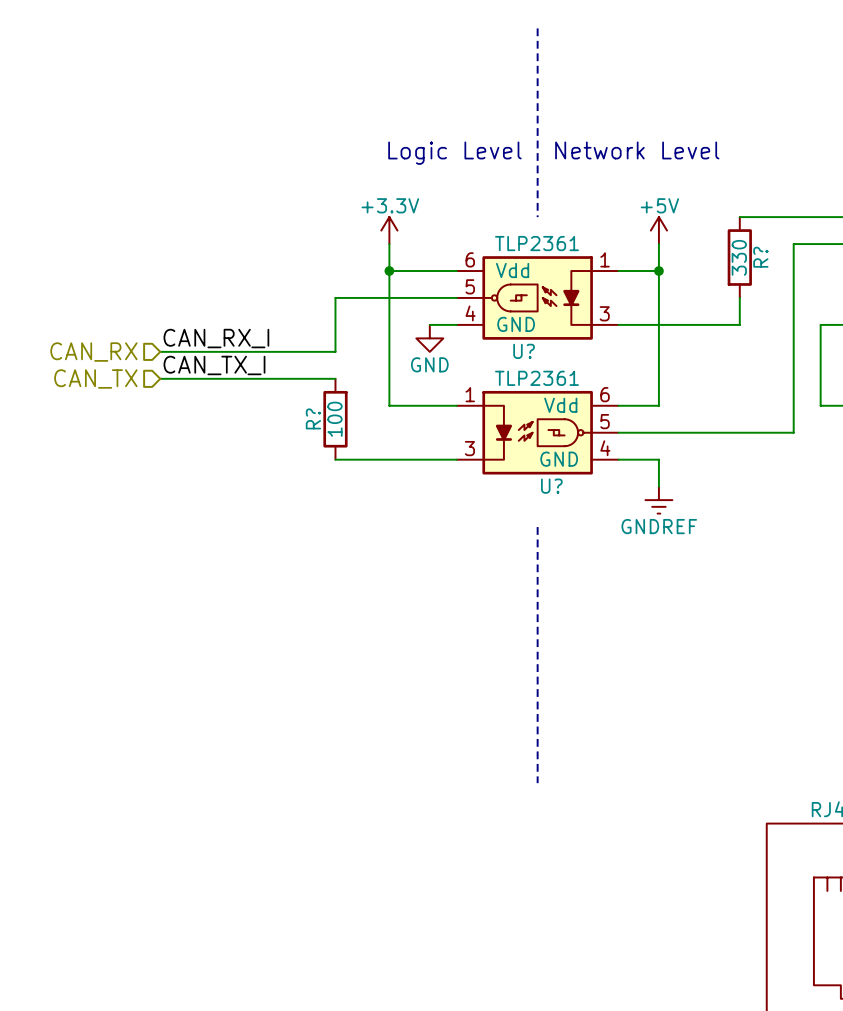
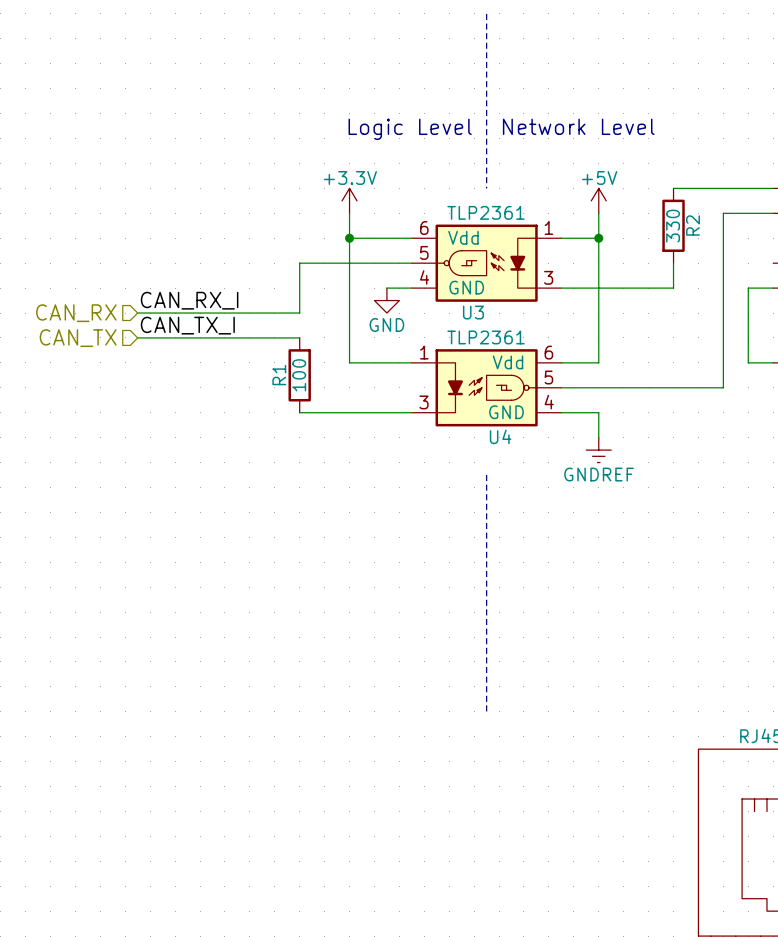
R? name: R? (760, 257) -> R2 (693, 225)
U? name: U? (524, 351) -> U3 (473, 312)
R? name: R? (313, 418) -> R1 (279, 375)
U? name: U? (551, 486) -> U4 (500, 436)

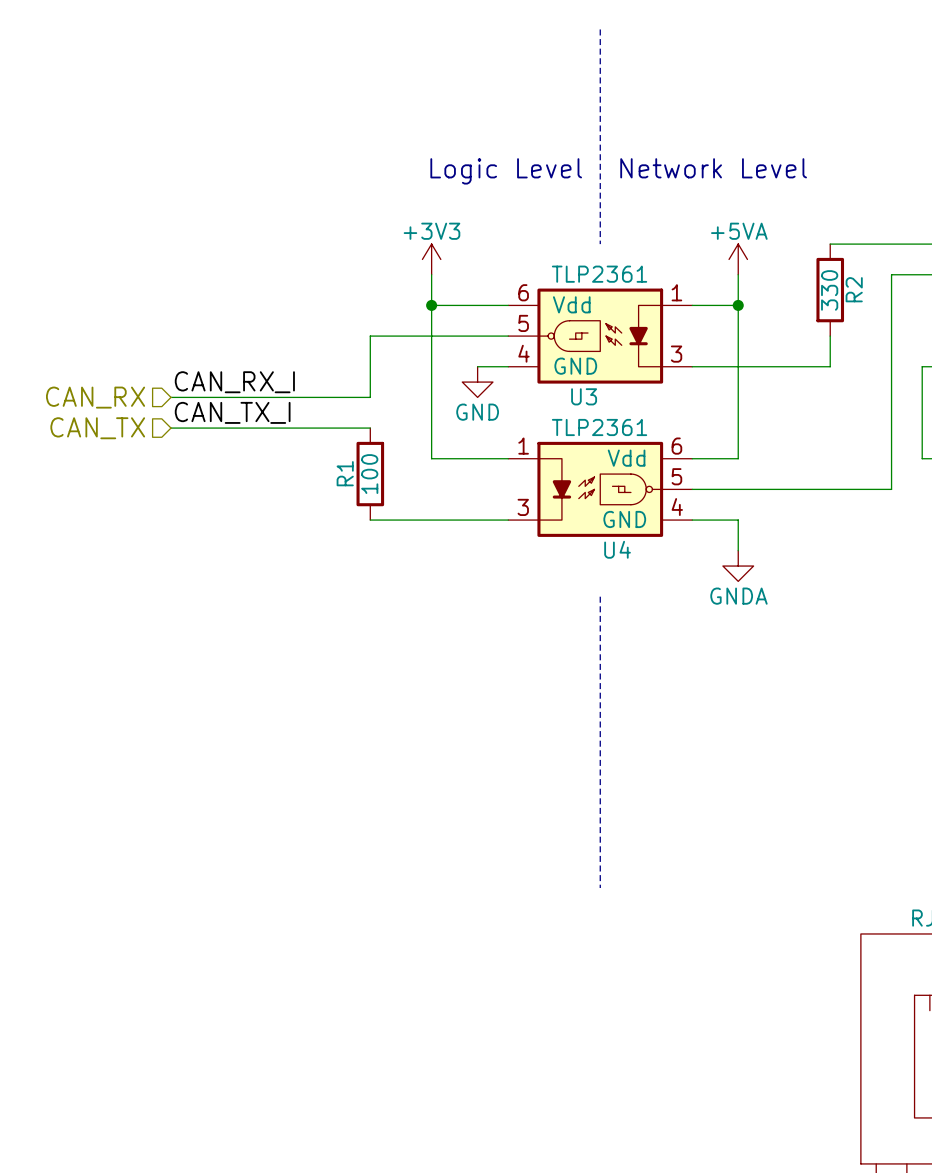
power symbol: +3.3V (349, 200) -> +3V3 (431, 259)
power symbol: +5V (598, 200) -> +5VA (738, 259)
power symbol: GNDREF (598, 450) -> GNDA (738, 566)

